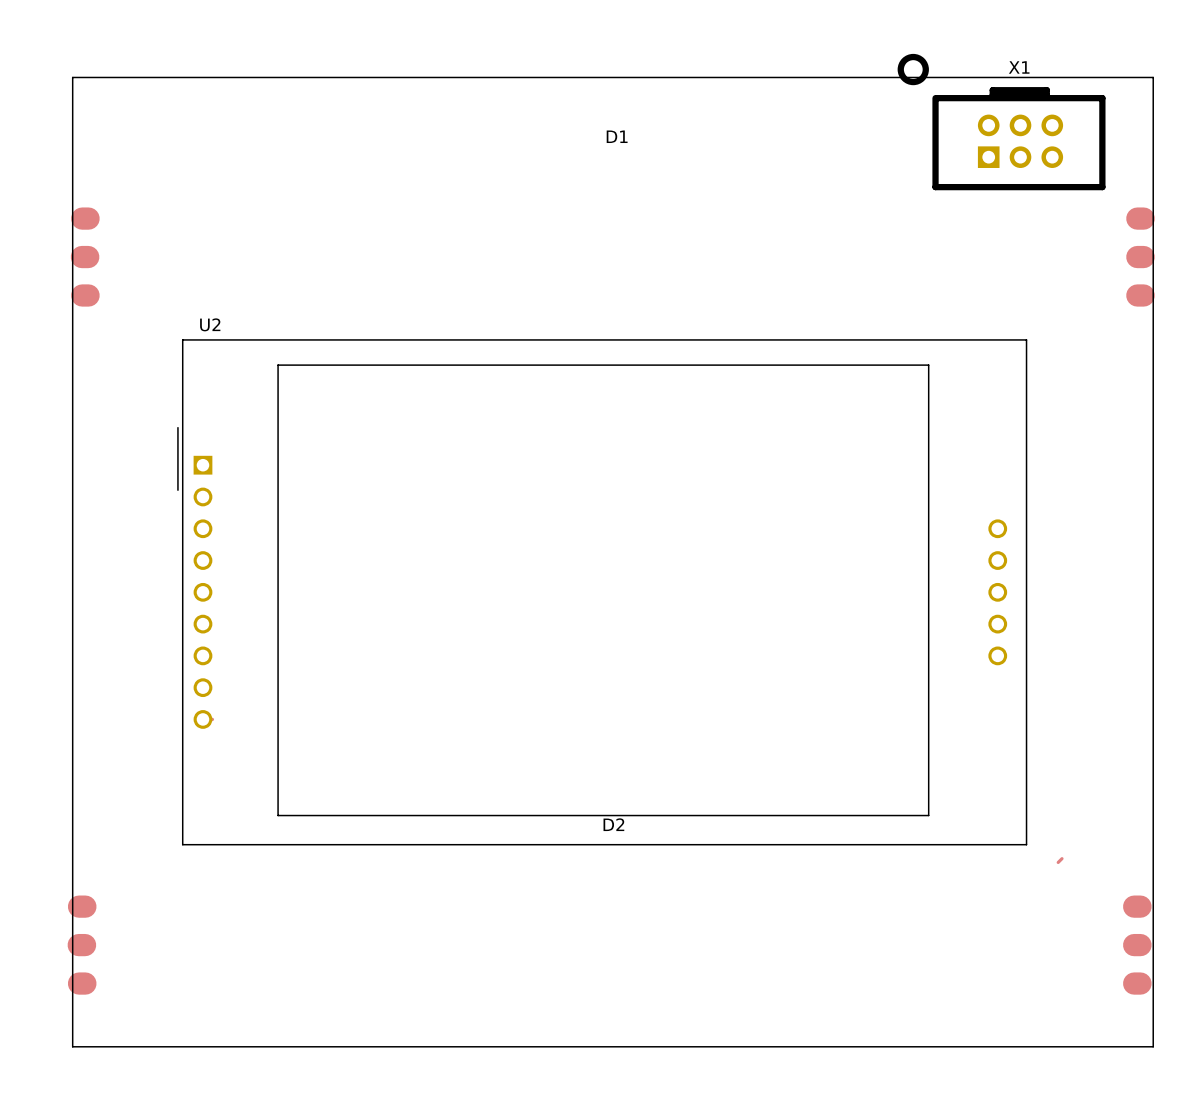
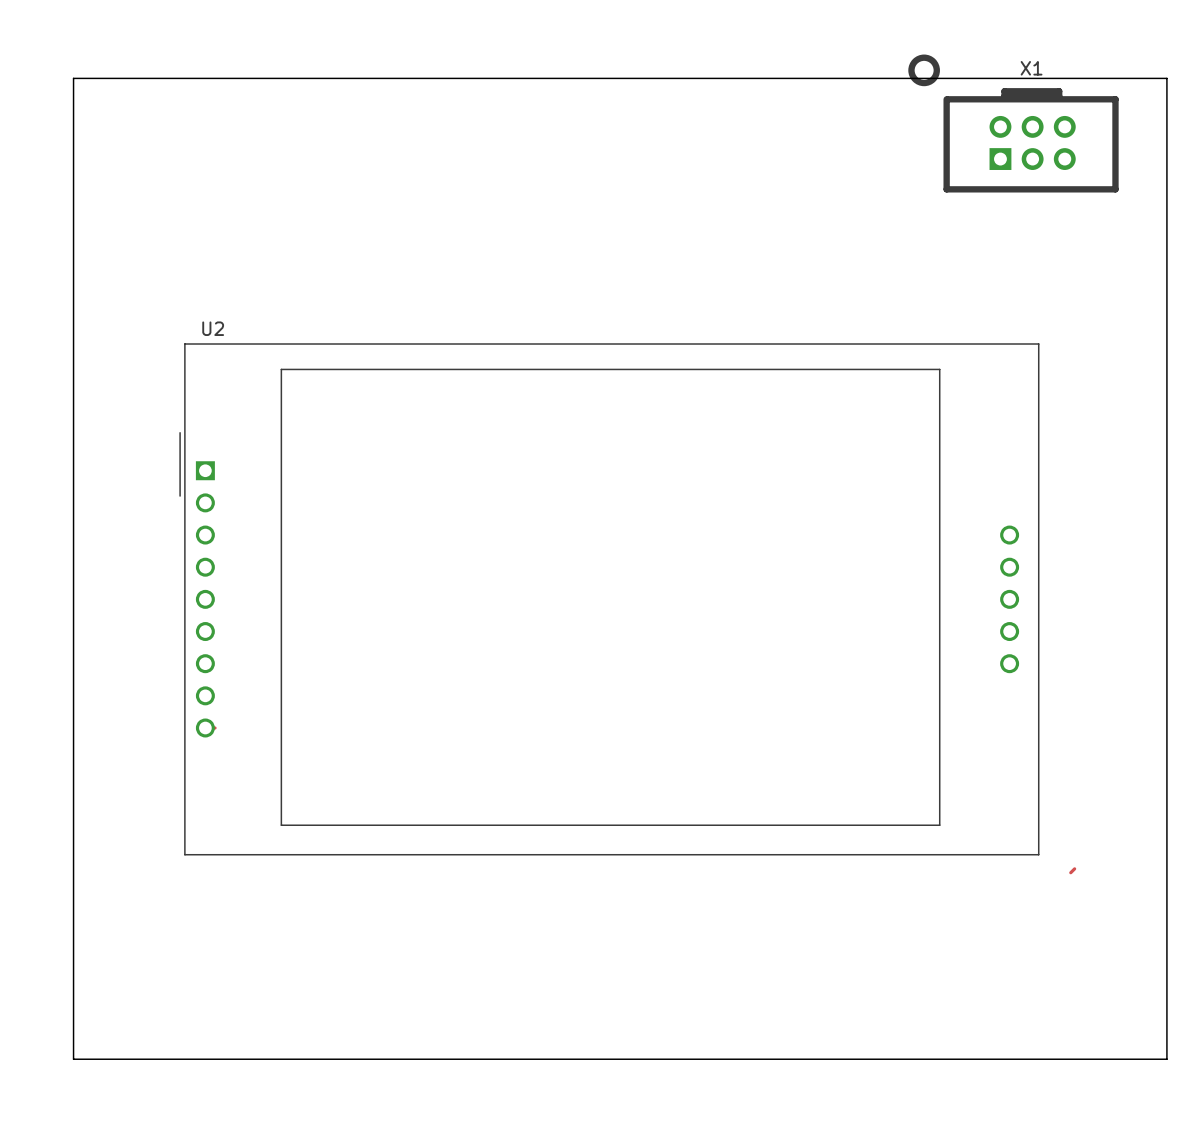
D1: (612, 257) -> none
D2: (609, 945) -> none

